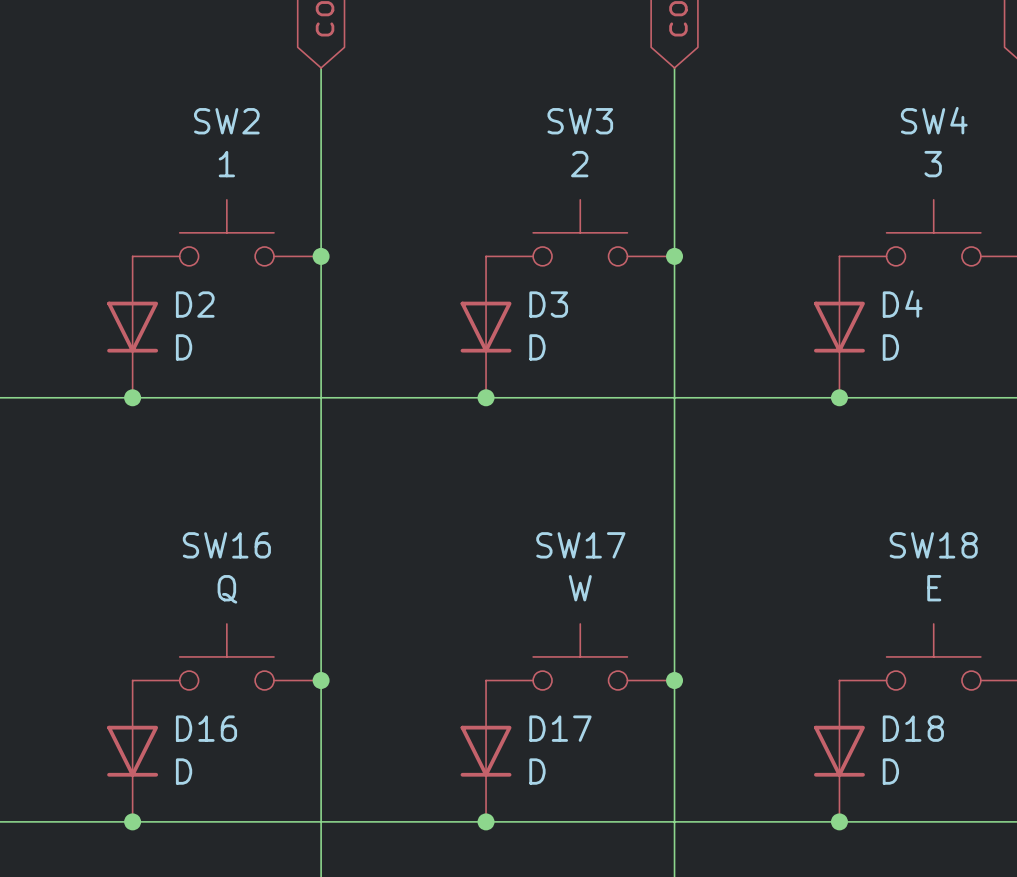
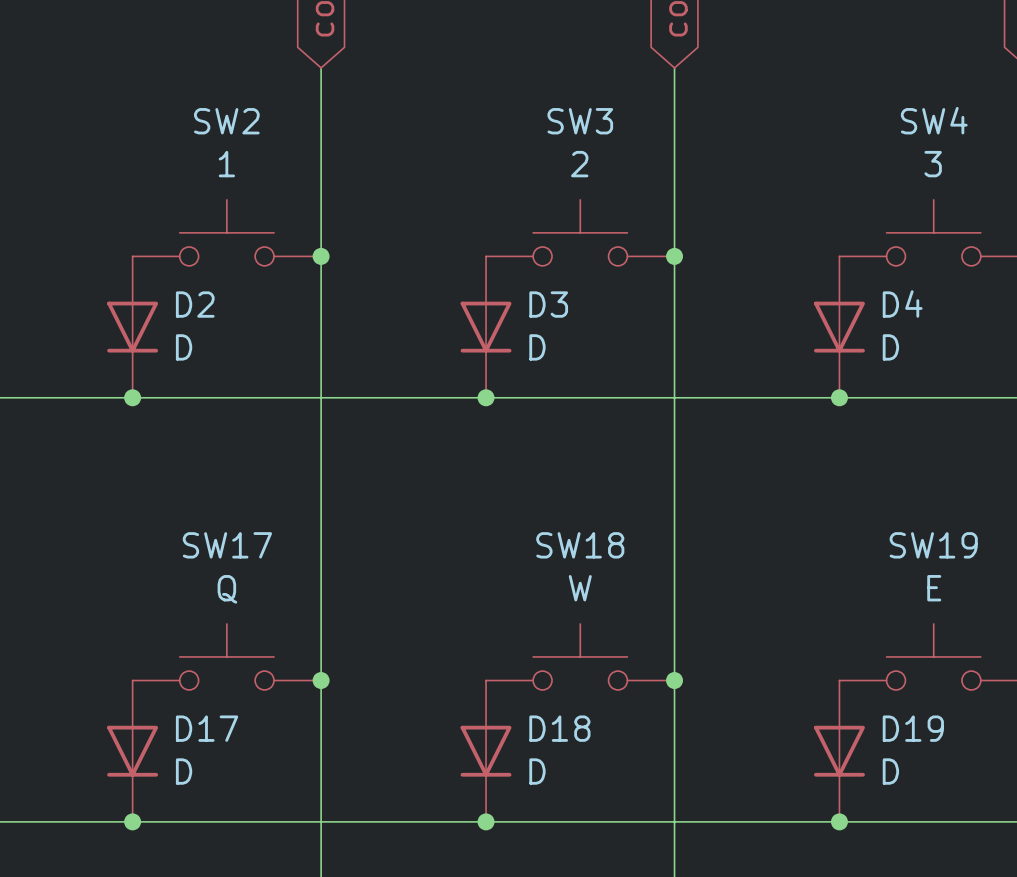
SW16 name: SW16 (226, 545) -> SW17 (227, 545)
SW17 name: SW17 (580, 545) -> SW18 (580, 545)
SW18 name: SW18 (933, 545) -> SW19 (933, 545)
D16 name: D16 (206, 728) -> D17 (207, 728)
D17 name: D17 (560, 728) -> D18 (559, 728)
D18 name: D18 (913, 728) -> D19 (913, 728)

